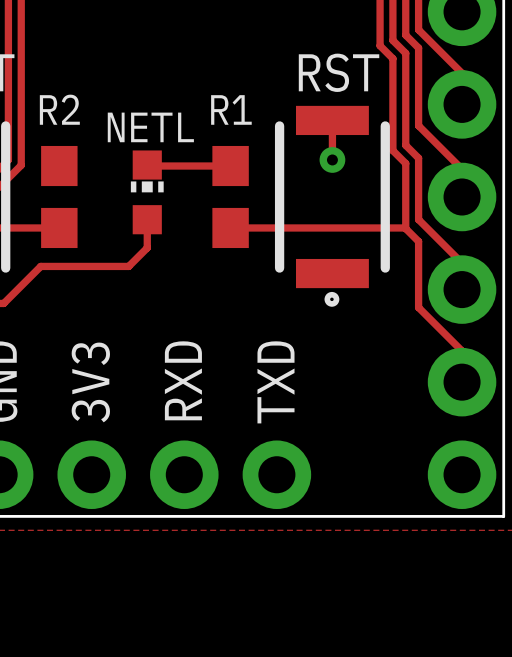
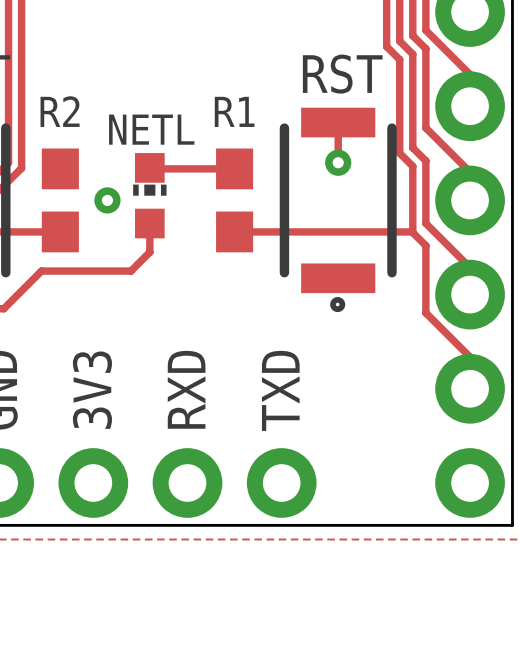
via: none -> (107, 200)

